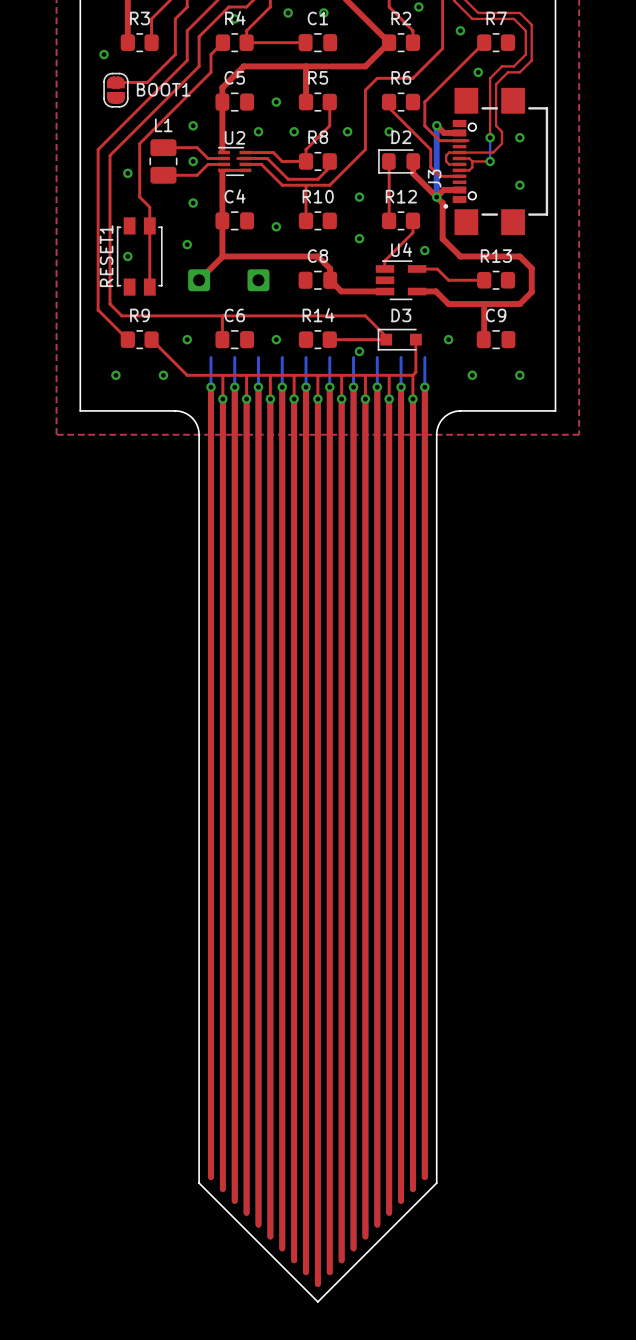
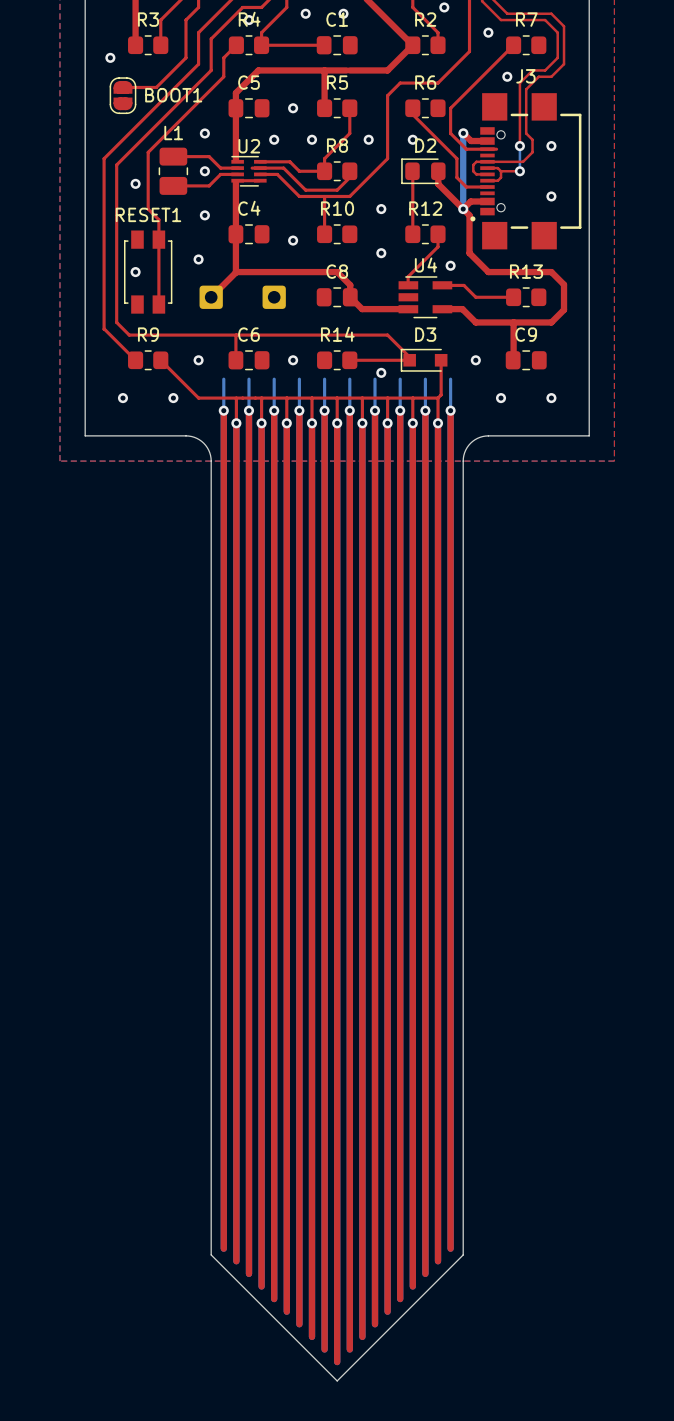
J3 name rotation: 0° (434, 178) -> 90° clockwise (525, 76)
J3 name position: J3 (434, 178) -> J3 (525, 76)
RESET1 name rotation: 0° (106, 256) -> 90° clockwise (148, 214)

